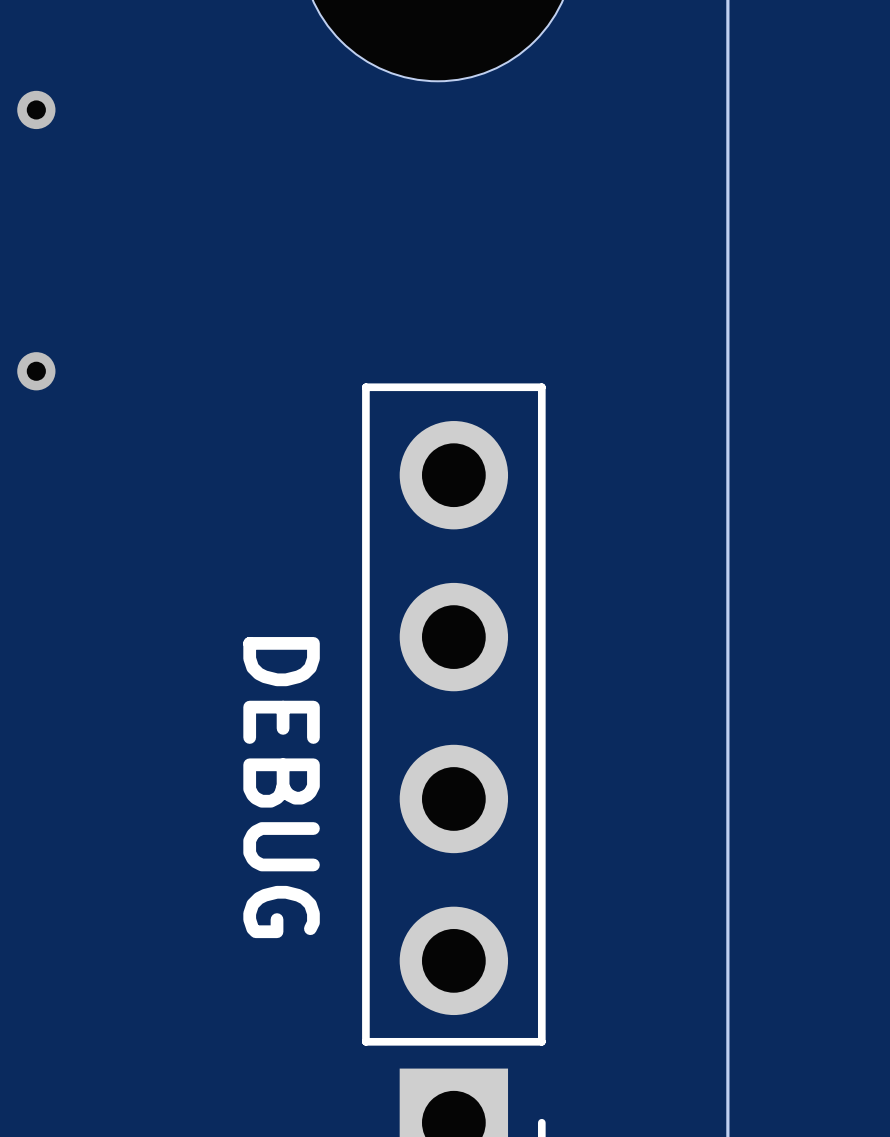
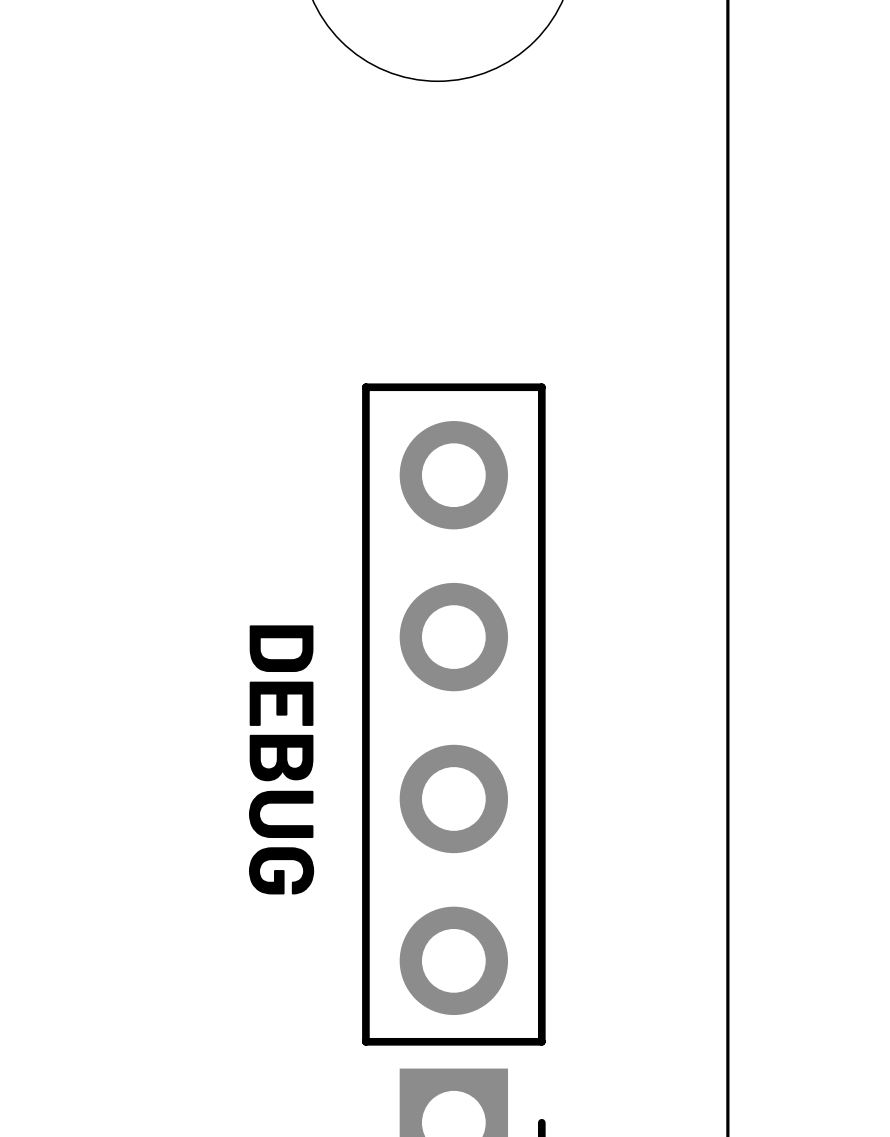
via: (36, 109) -> none
via: (36, 371) -> none

